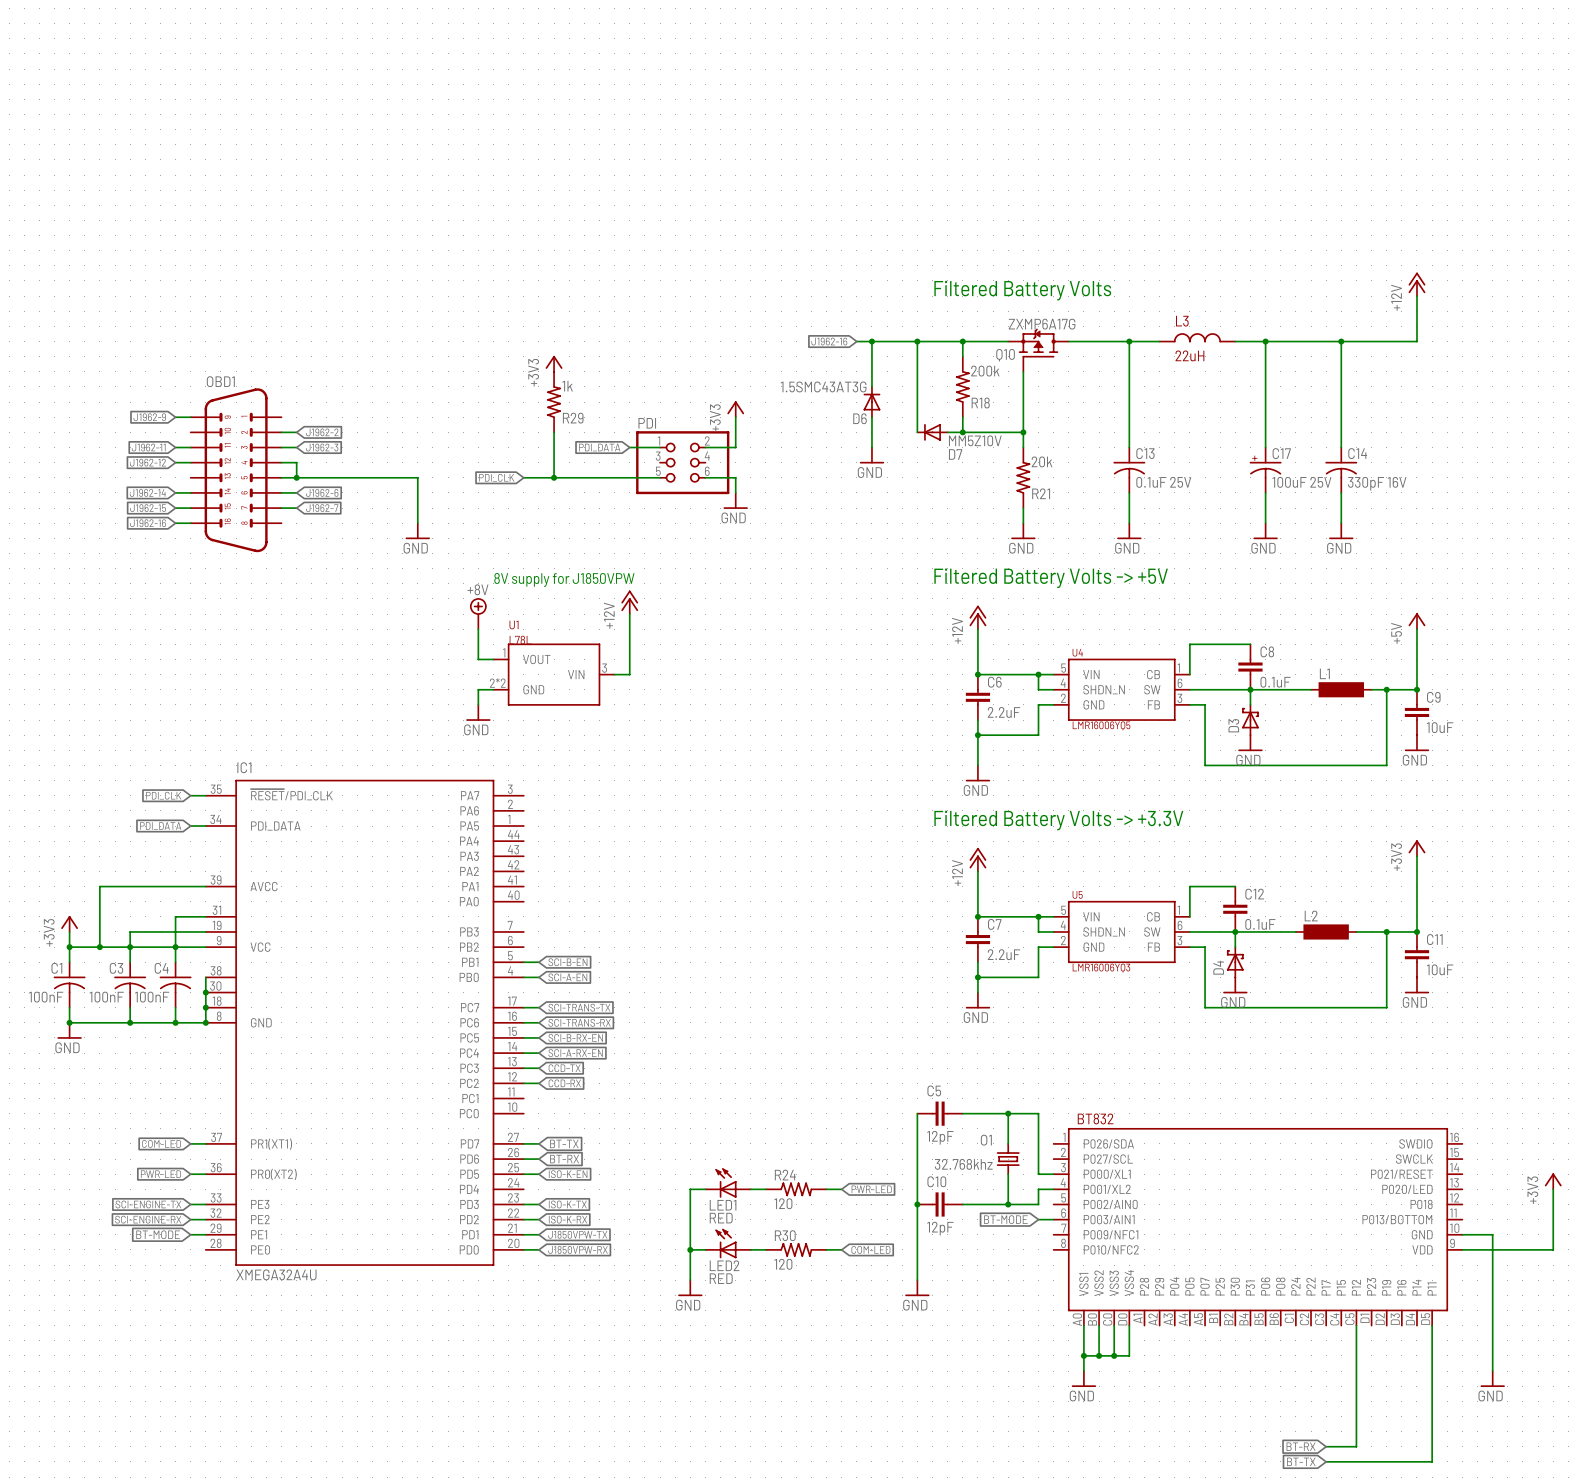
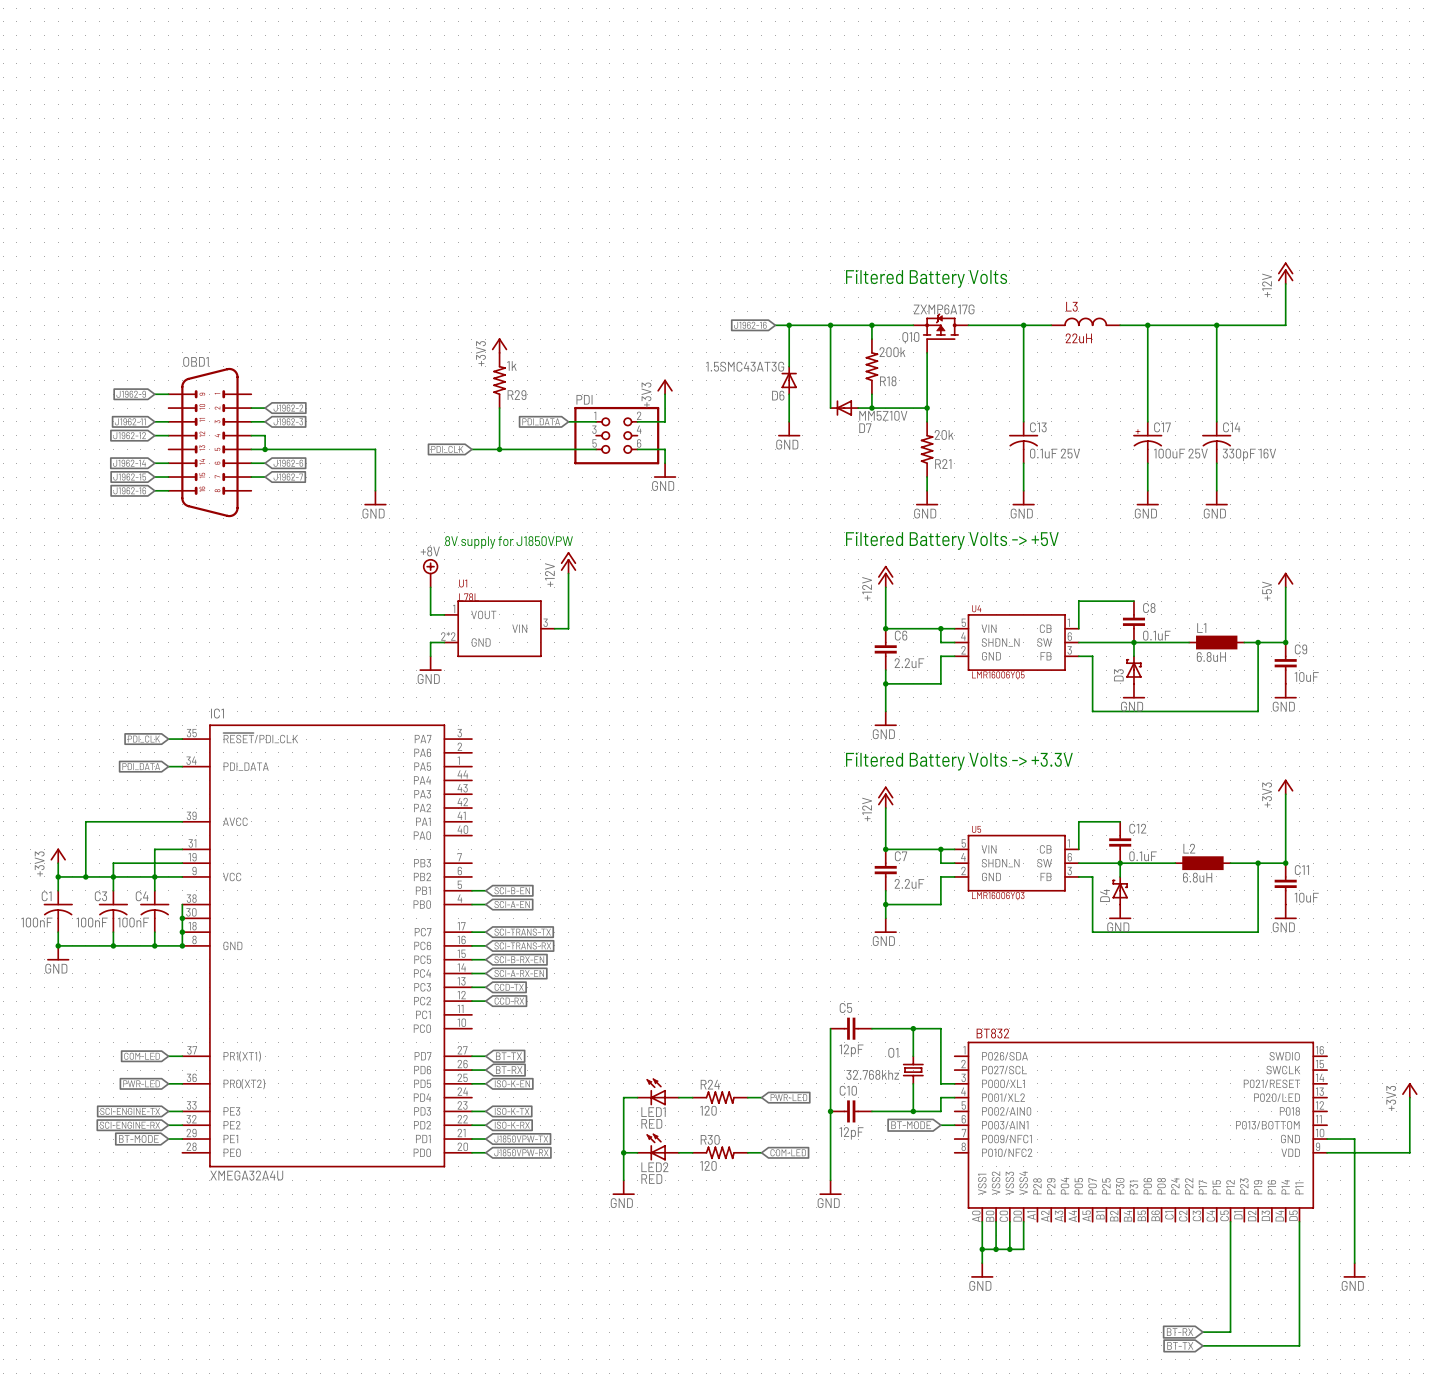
L1 value: none -> 6.8uH (1211, 656)
L2 value: none -> 6.8uH (1197, 877)

